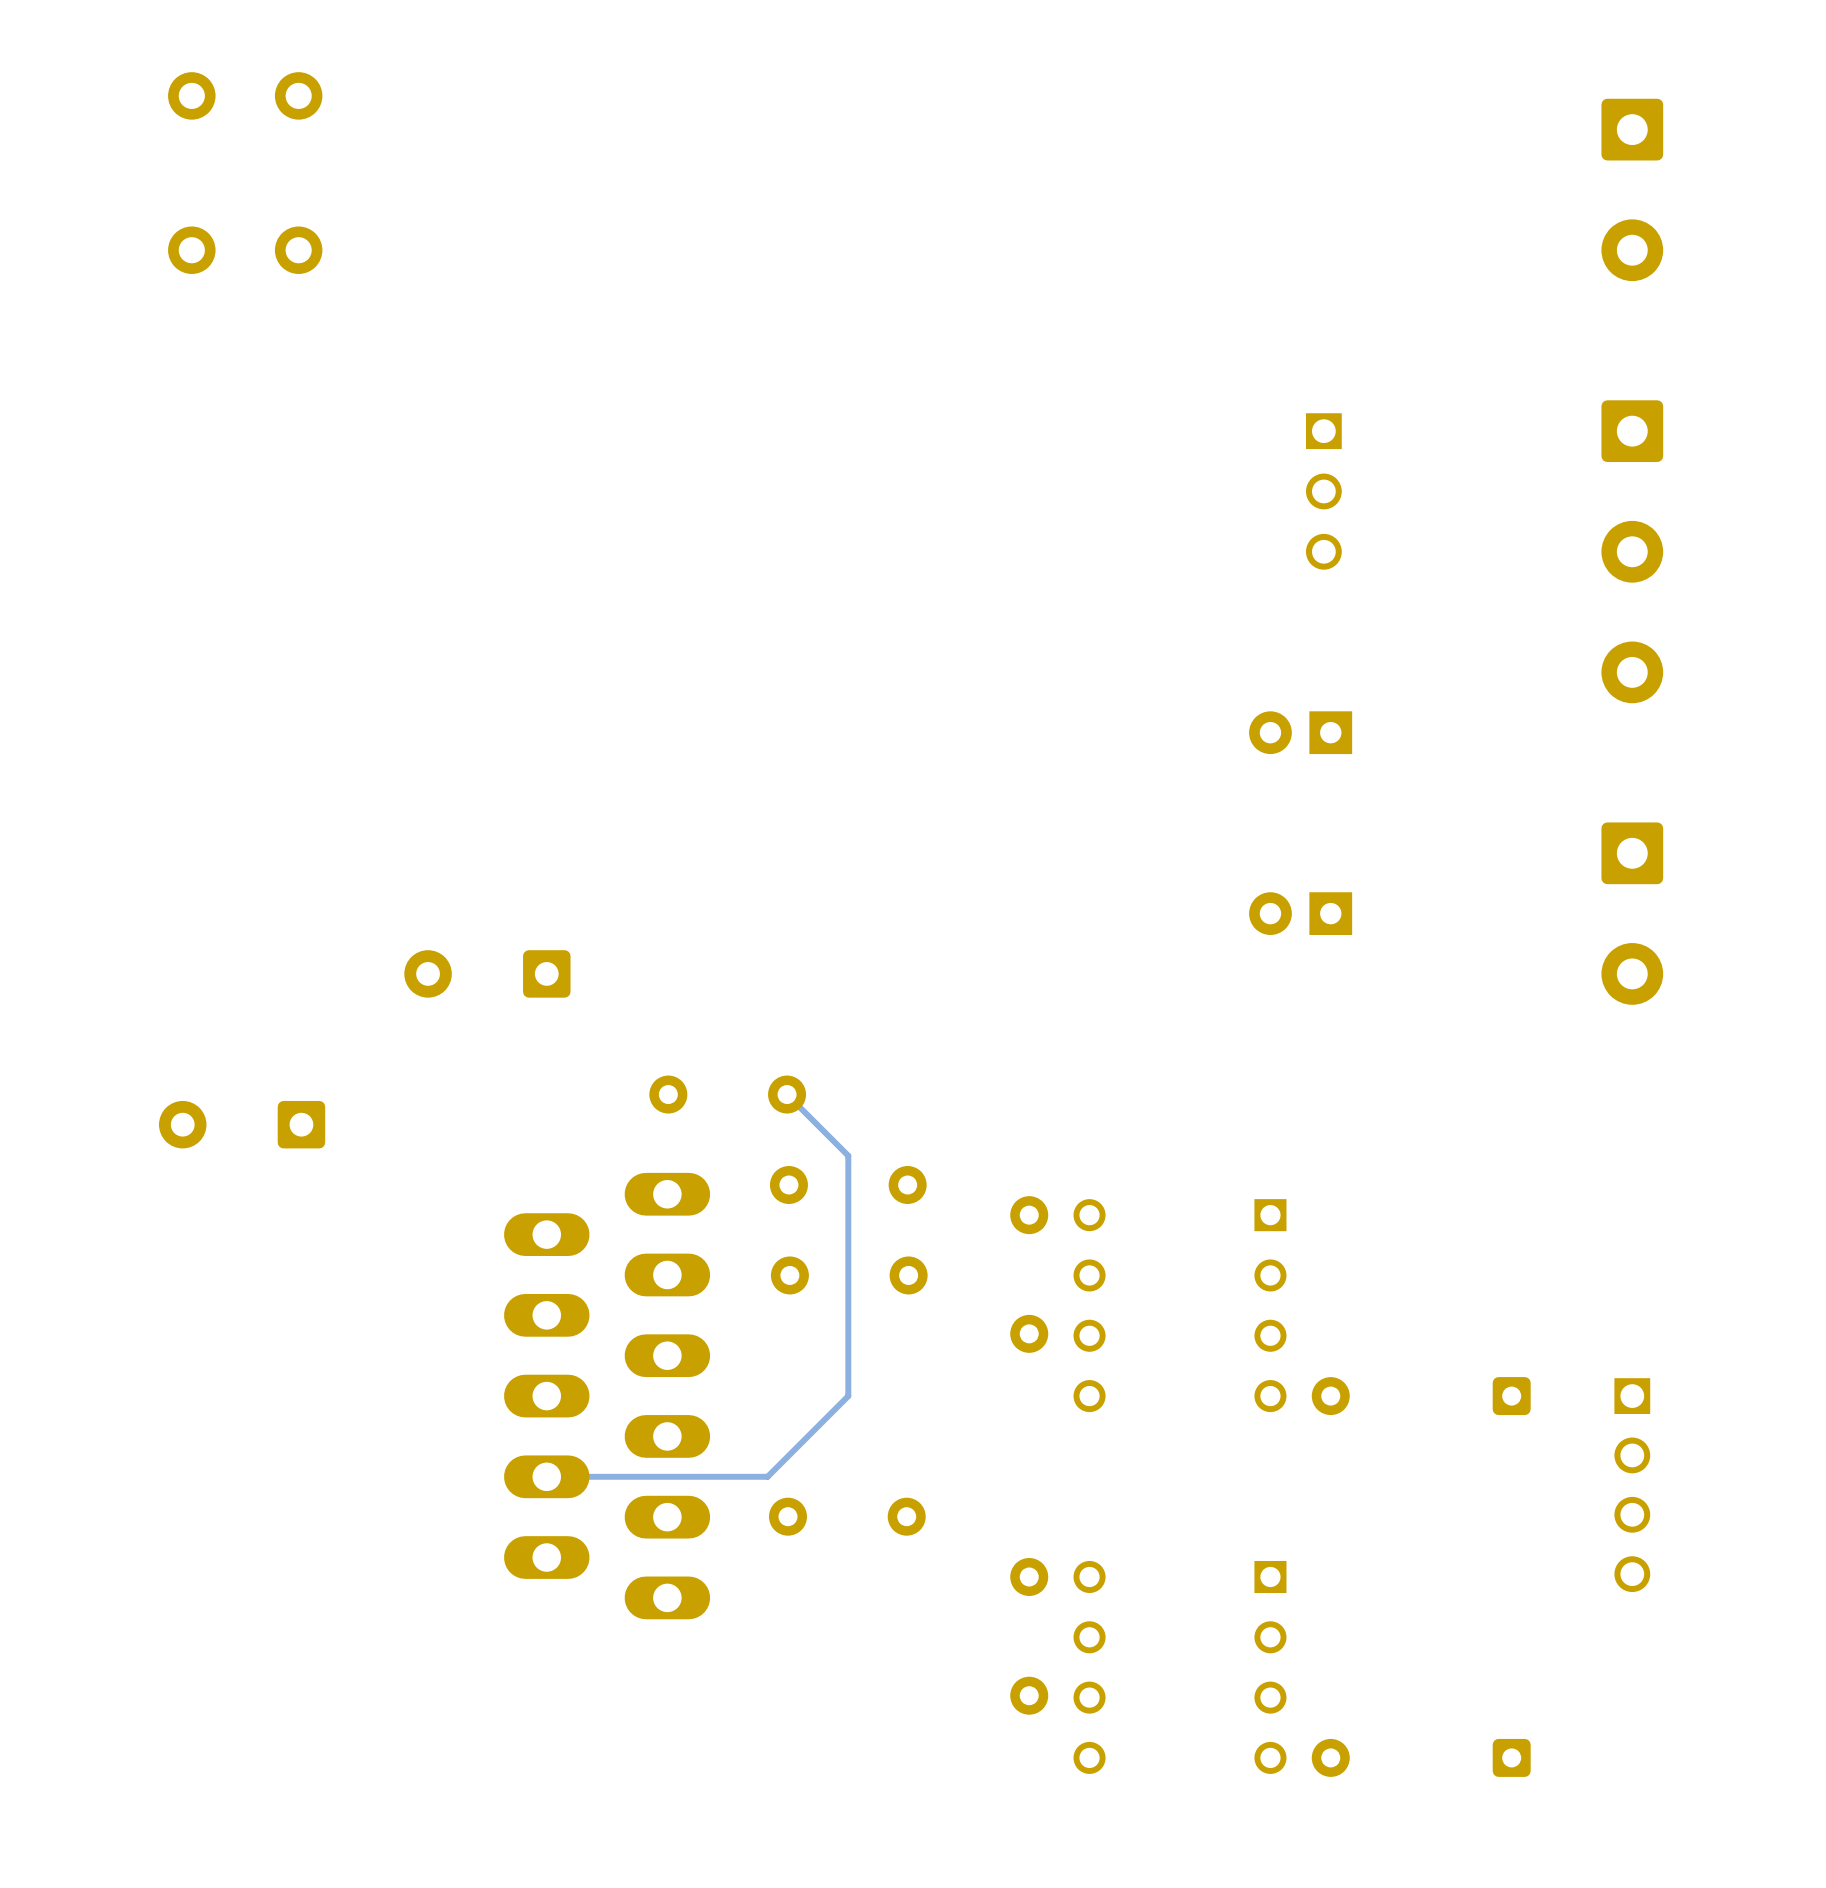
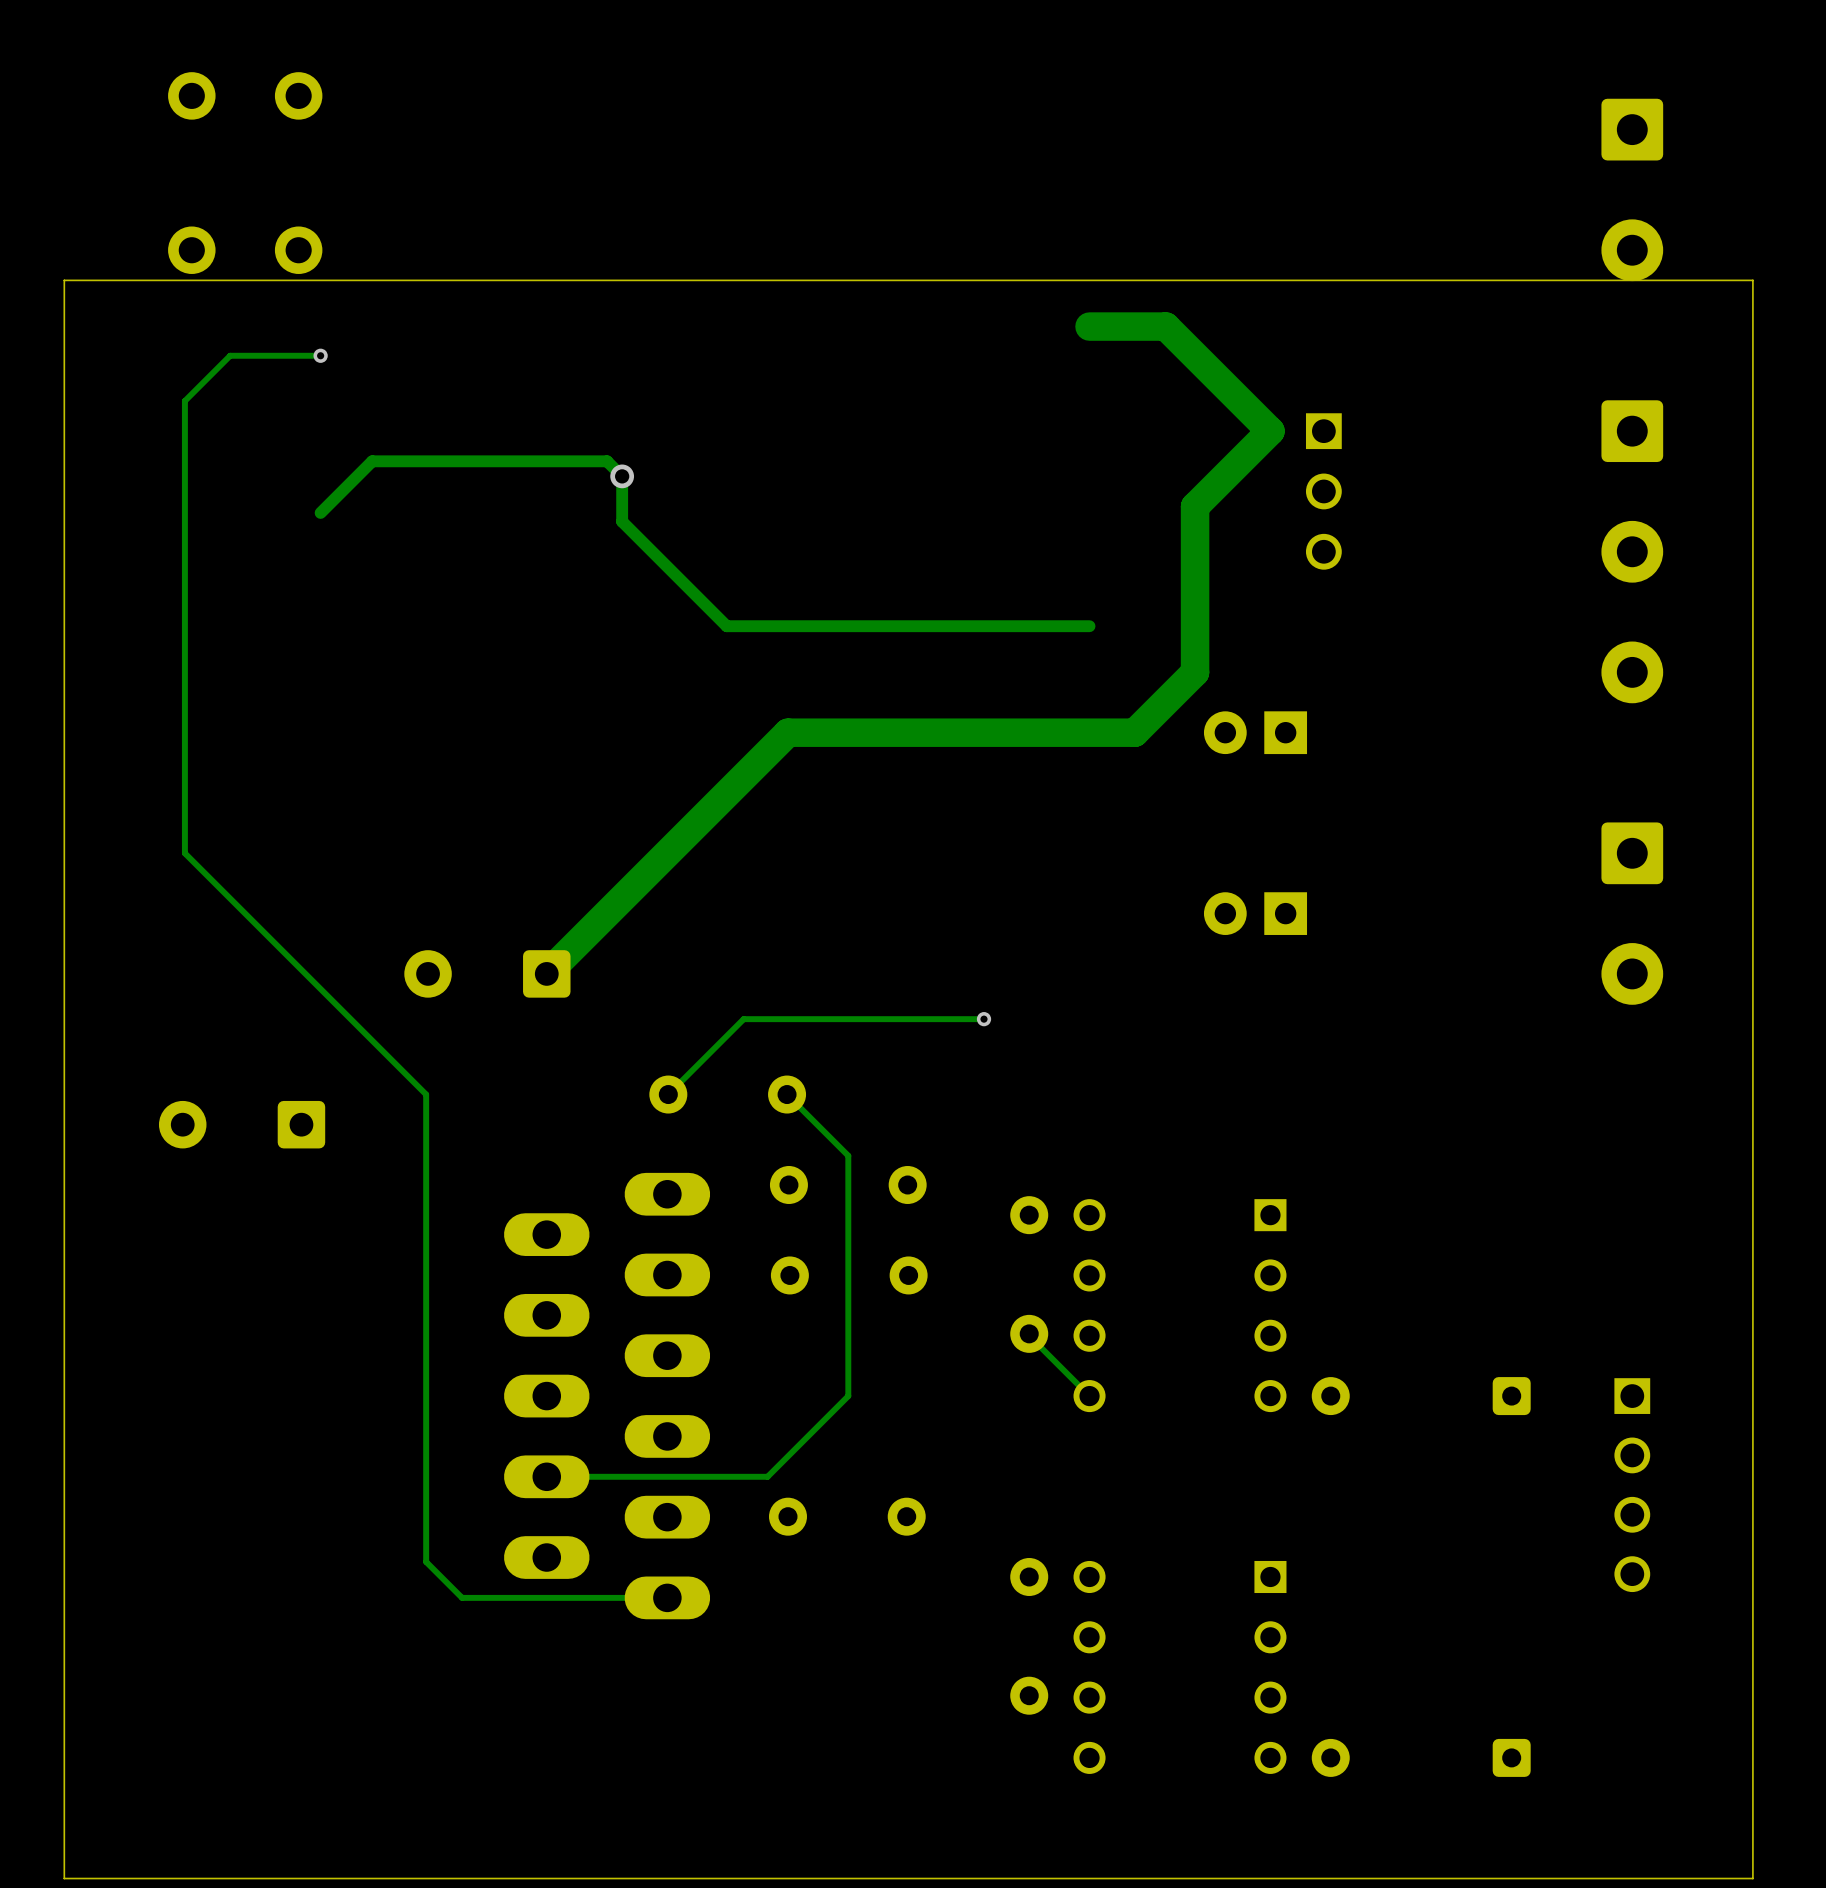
board edge: none -> (1752, 280) (64, 280) (64, 1878) (1752, 1878) (1752, 280)
track: none -> (1089, 326) (1165, 326) (1270, 431) (1195, 506) (1195, 672) (1134, 732) (788, 732) (546, 973)
track: none -> (320, 355) (230, 355) (184, 401) (184, 853) (426, 1094) (426, 1561) (462, 1597) (667, 1597)
via: none -> (320, 355)
via: none -> (622, 476)
track: none -> (320, 512) (372, 461) (607, 461) (622, 476) (622, 521) (726, 626) (1089, 626)
part position: (1300, 732) -> (1255, 732)
part position: (1300, 913) -> (1255, 913)
track: none -> (984, 1019) (743, 1019) (668, 1094)
via: none -> (984, 1019)
track: none -> (1029, 1333) (1089, 1396)

